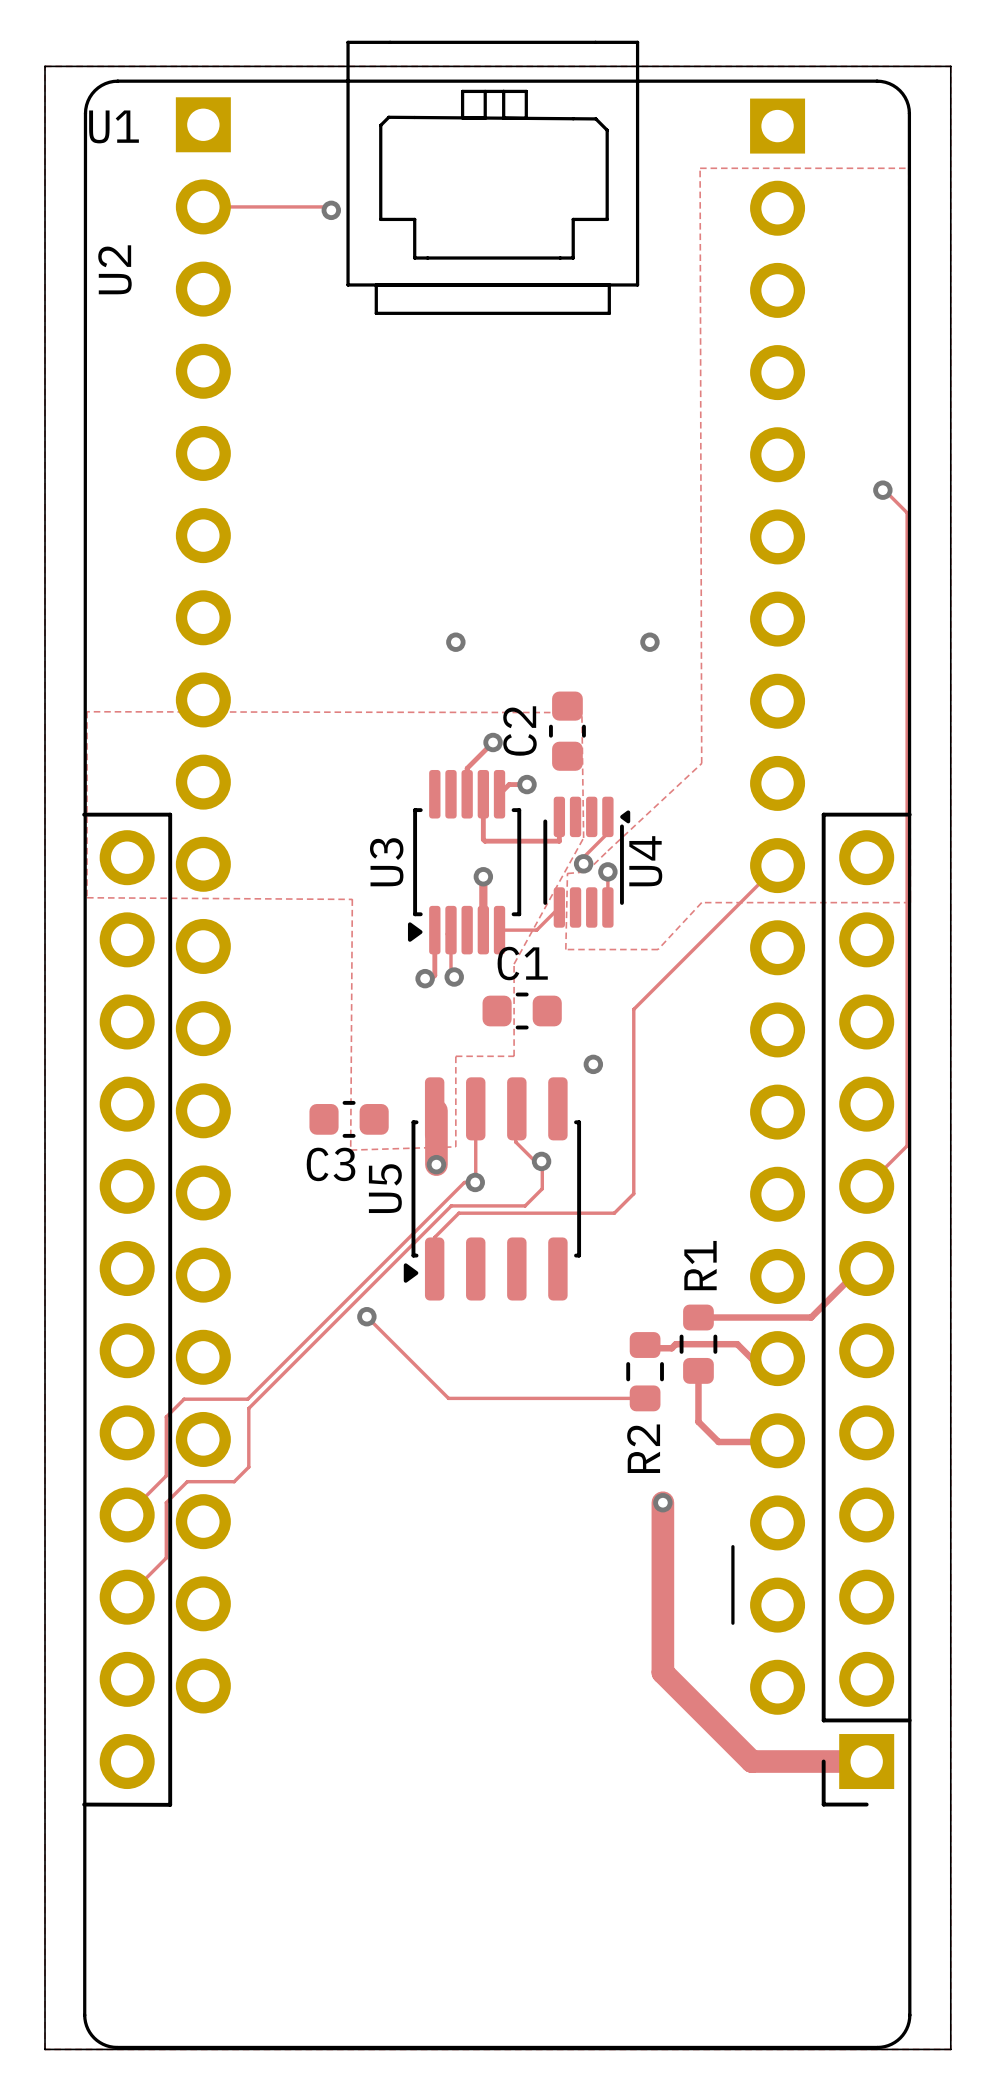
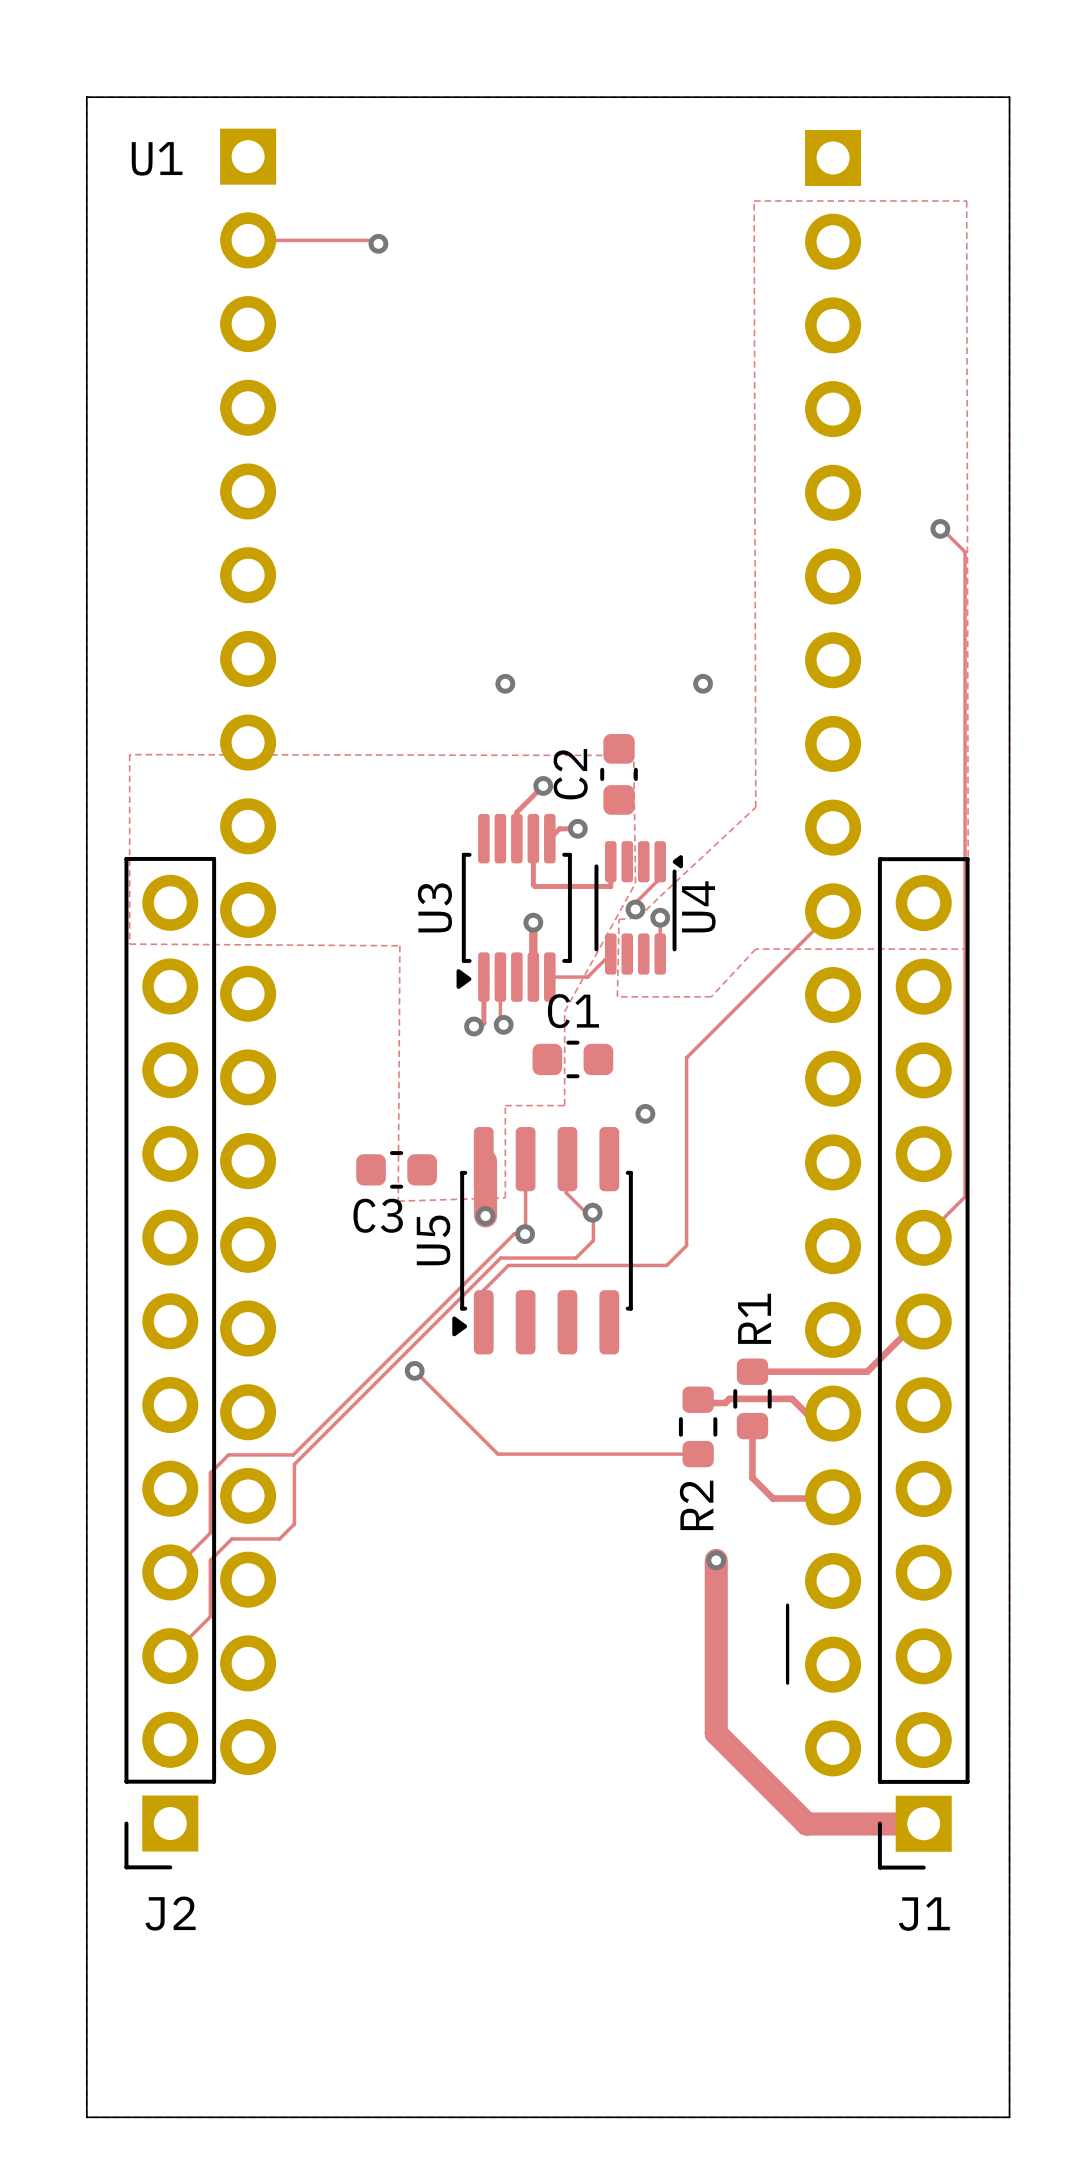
U2: (496, 1044) -> none
J2: none -> (170, 1363)
J1: none -> (923, 1363)

